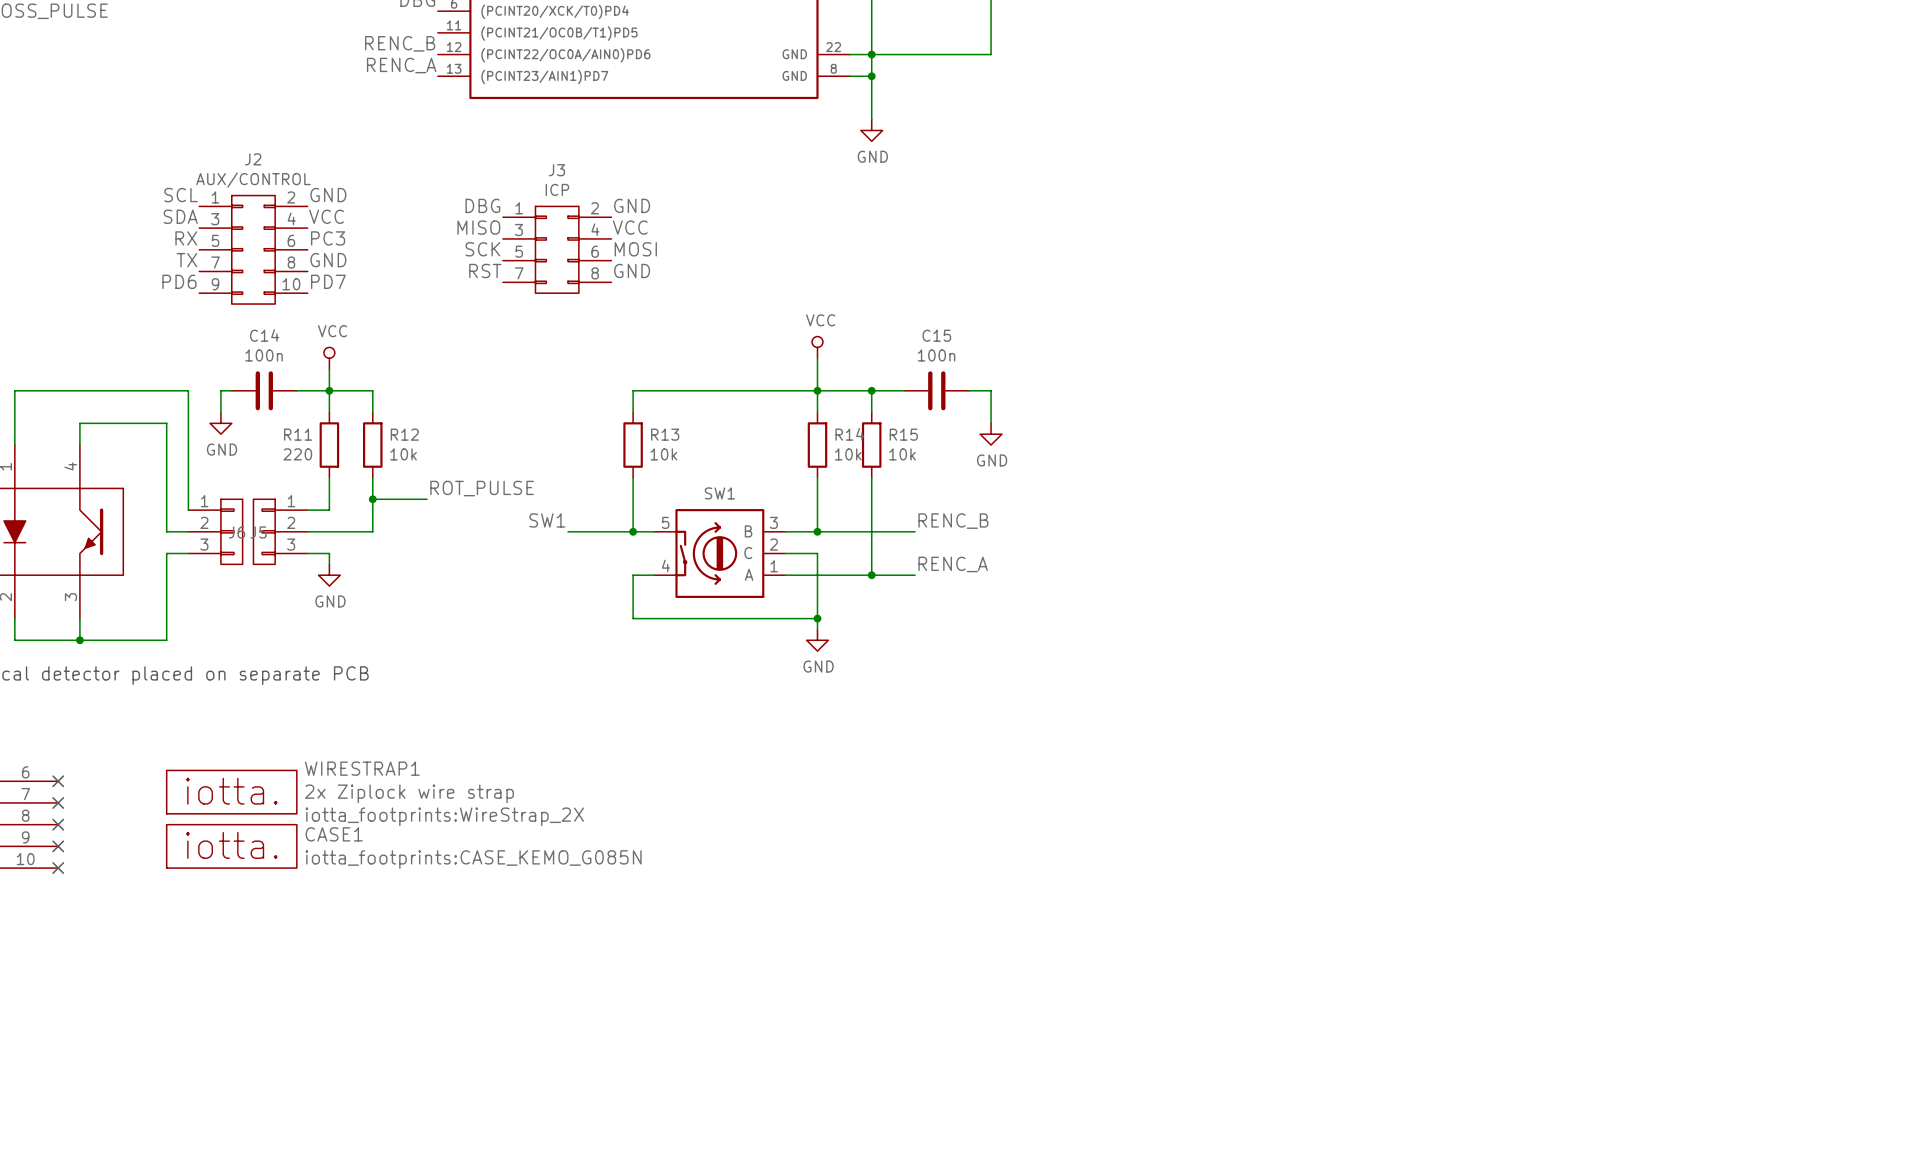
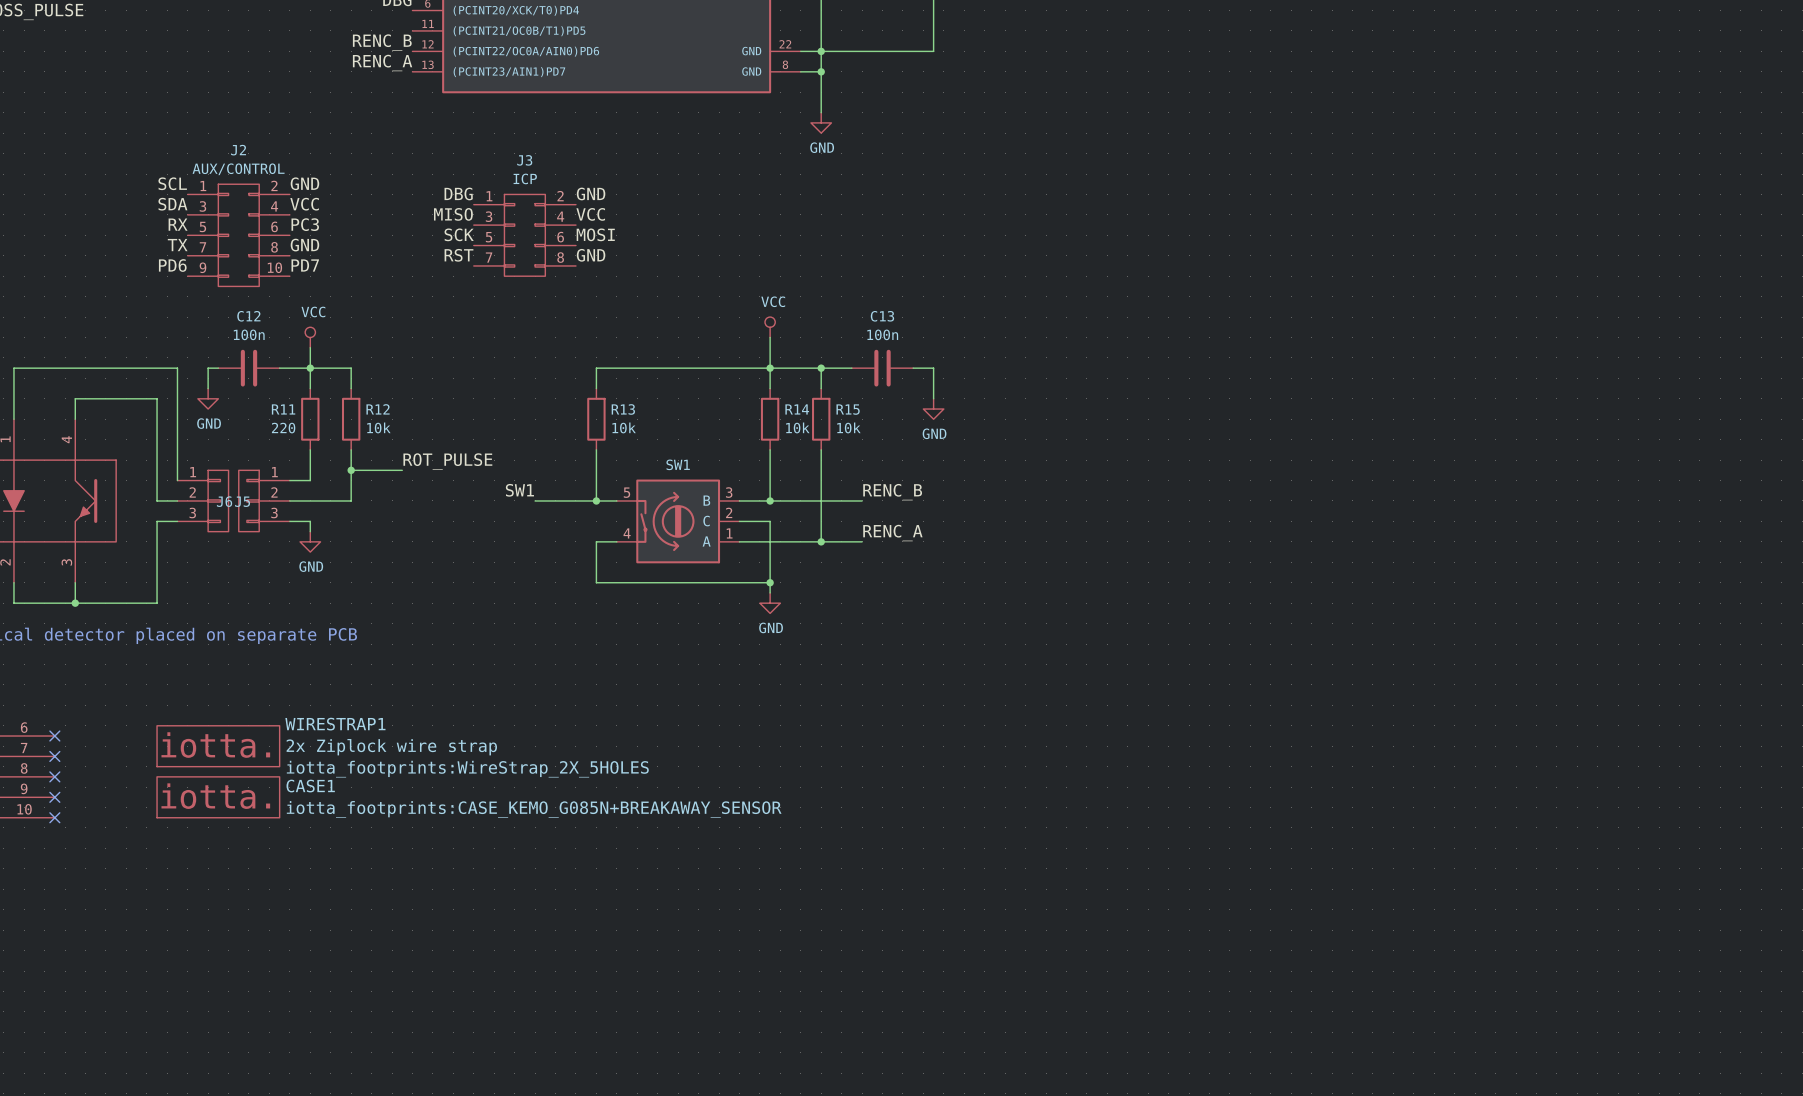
C14 name: C14 (264, 335) -> C12 (248, 316)
C15 name: C15 (936, 335) -> C13 (882, 316)
WIRESTRAP1 text: iotta_footprints:WireStrap_2X (444, 816) -> iotta_footprints:WireStrap_2X_5HOLES (467, 769)
CASE1 text: iotta_footprints:CASE_KEMO_G085N (473, 859) -> iotta_footprints:CASE_KEMO_G085N+BREAKAWAY_SENSOR (534, 809)

